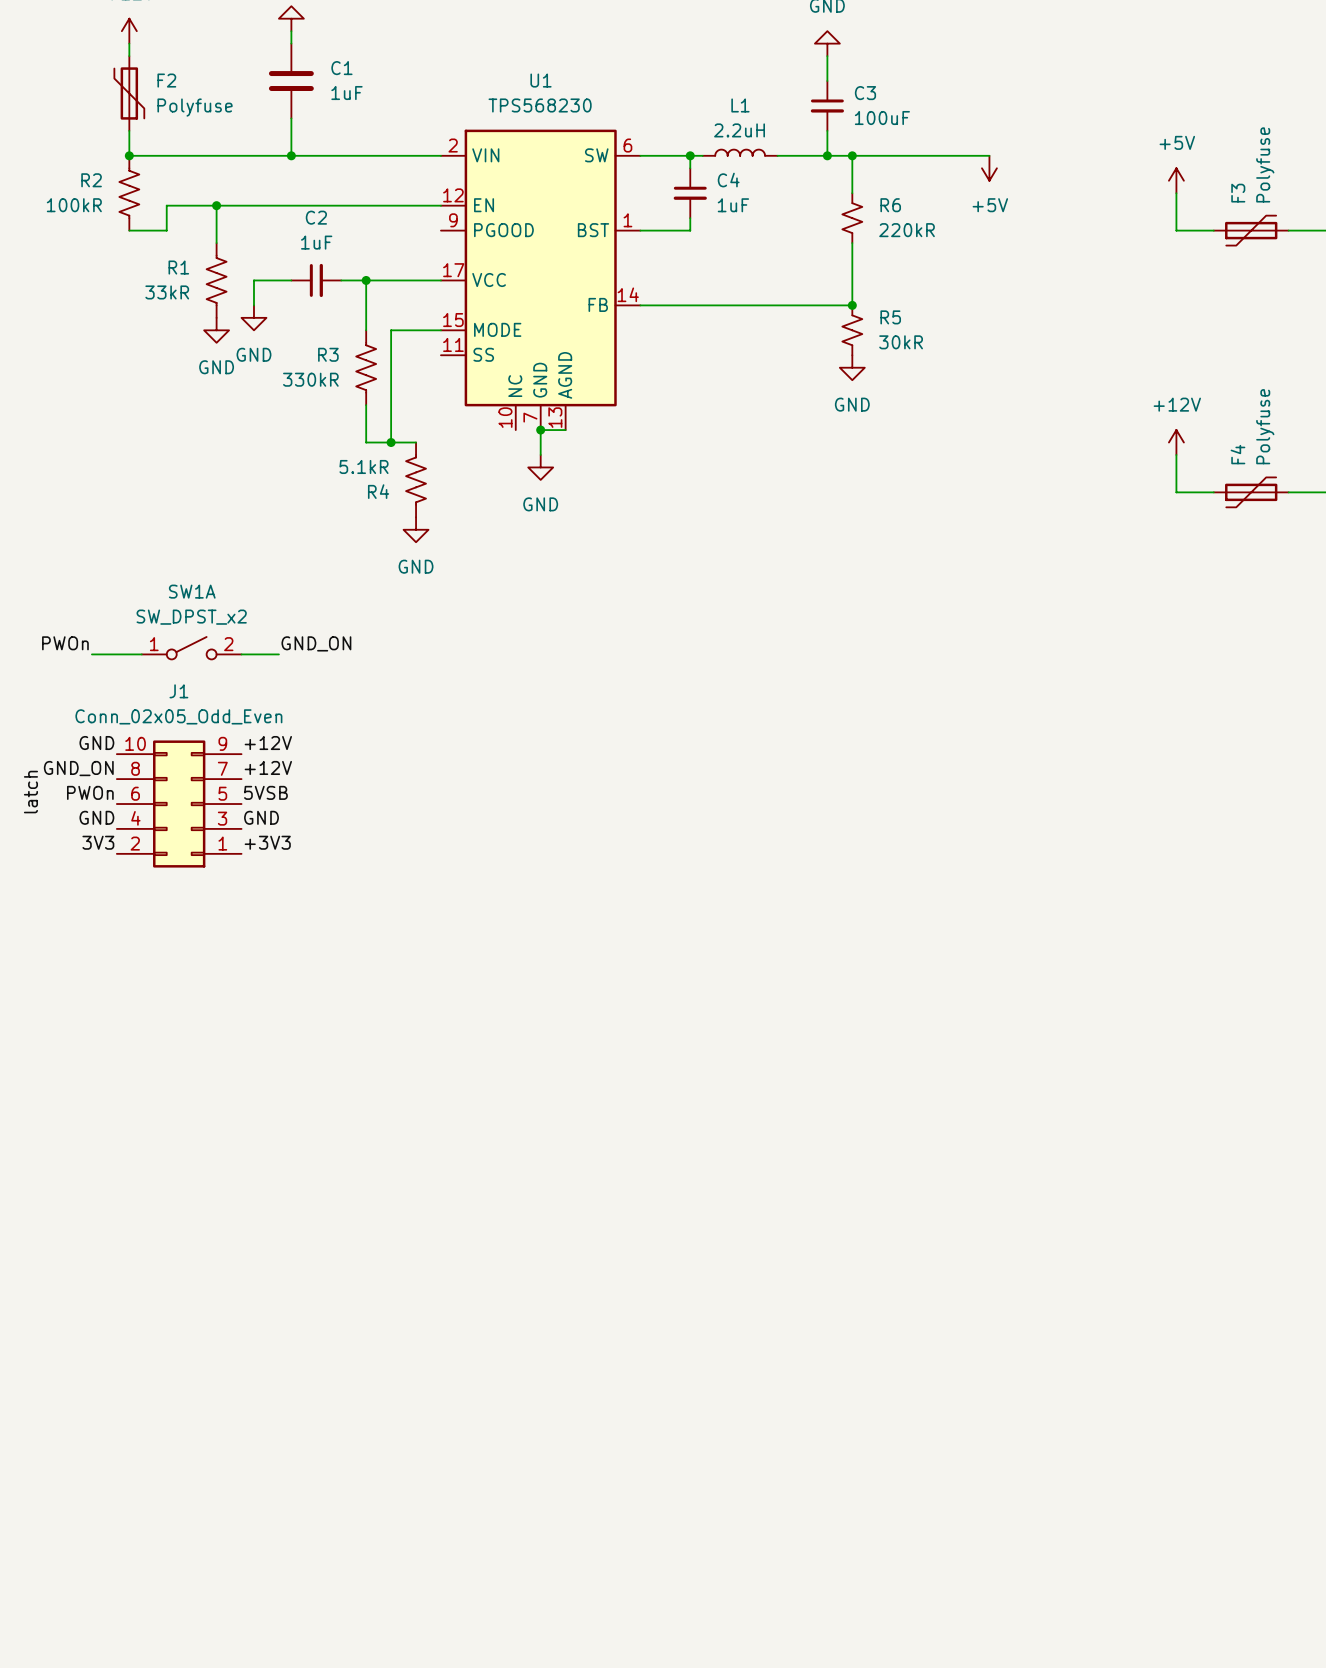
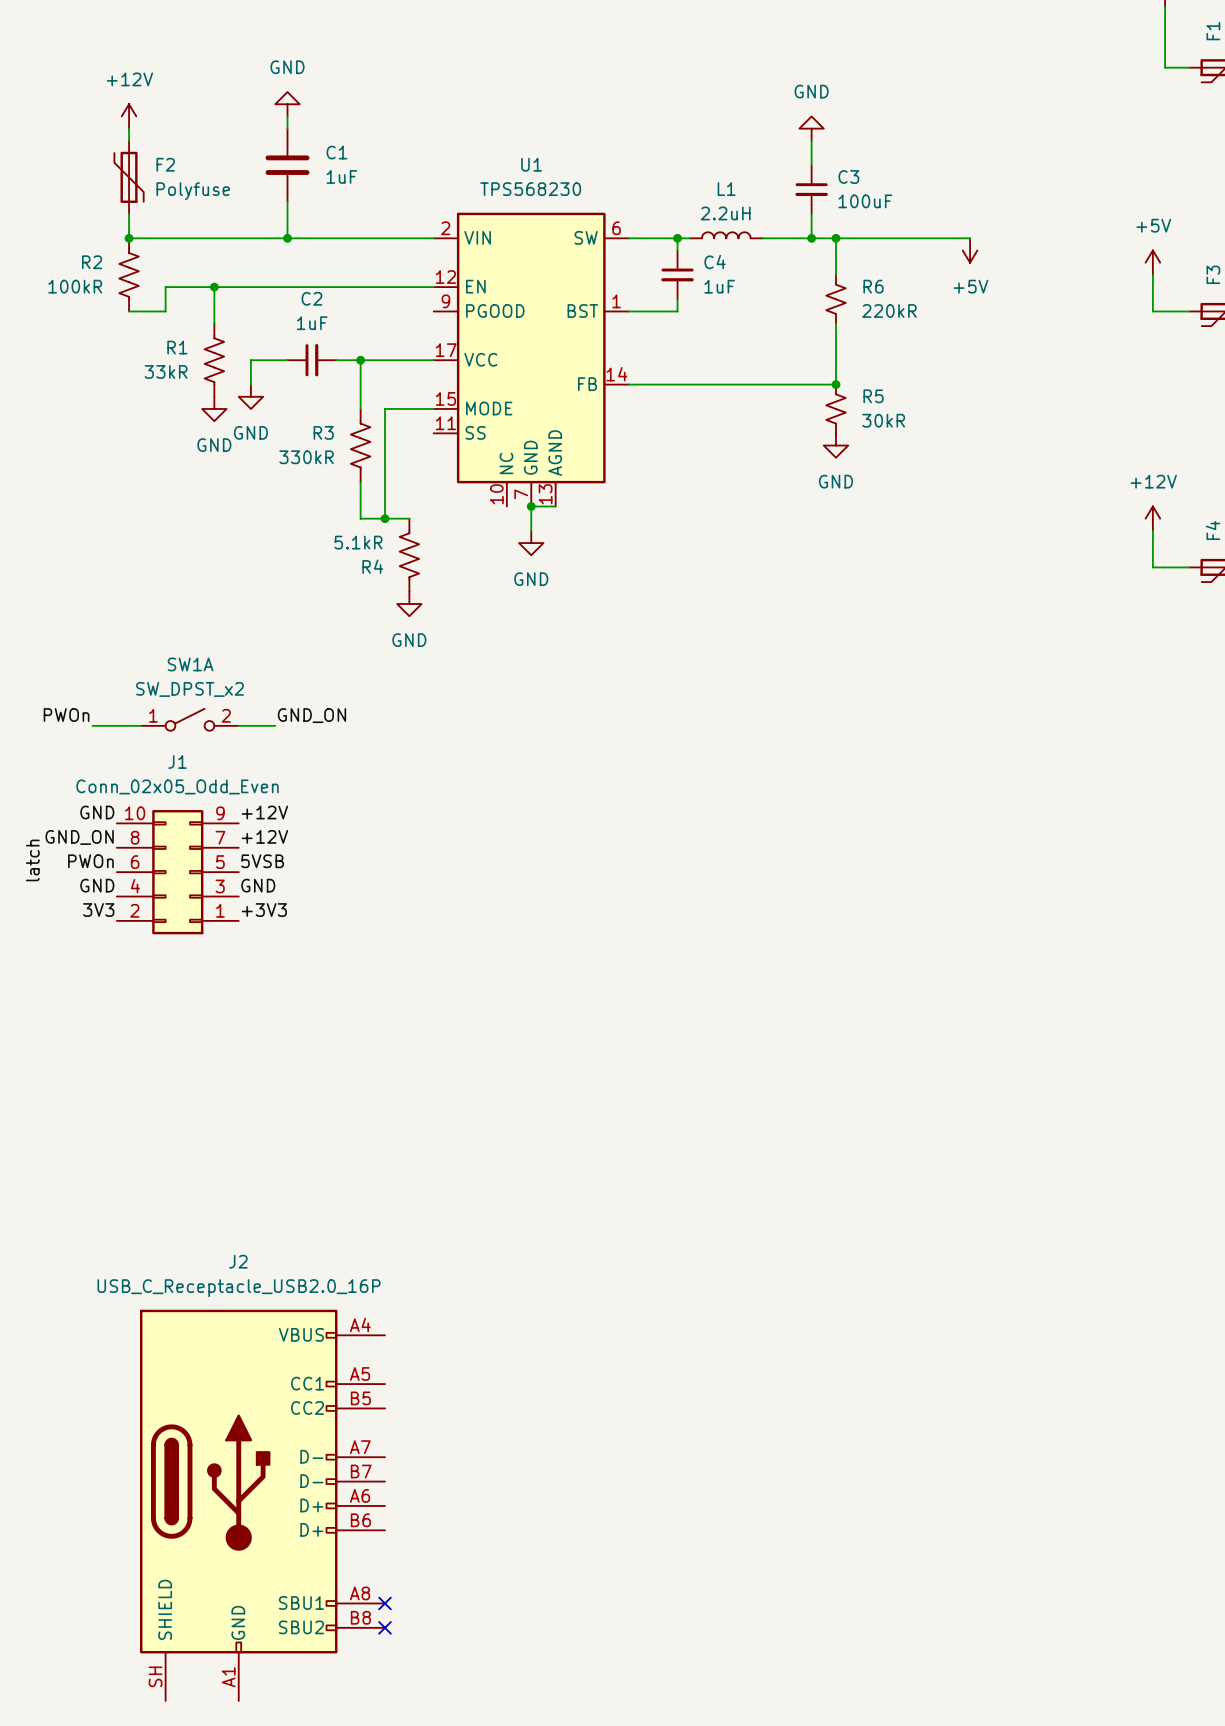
J2: none -> USB_C_Receptacle_USB2.0_16P (262, 1505)
no-connect mark: none -> (385, 1603)
no-connect mark: none -> (385, 1627)

